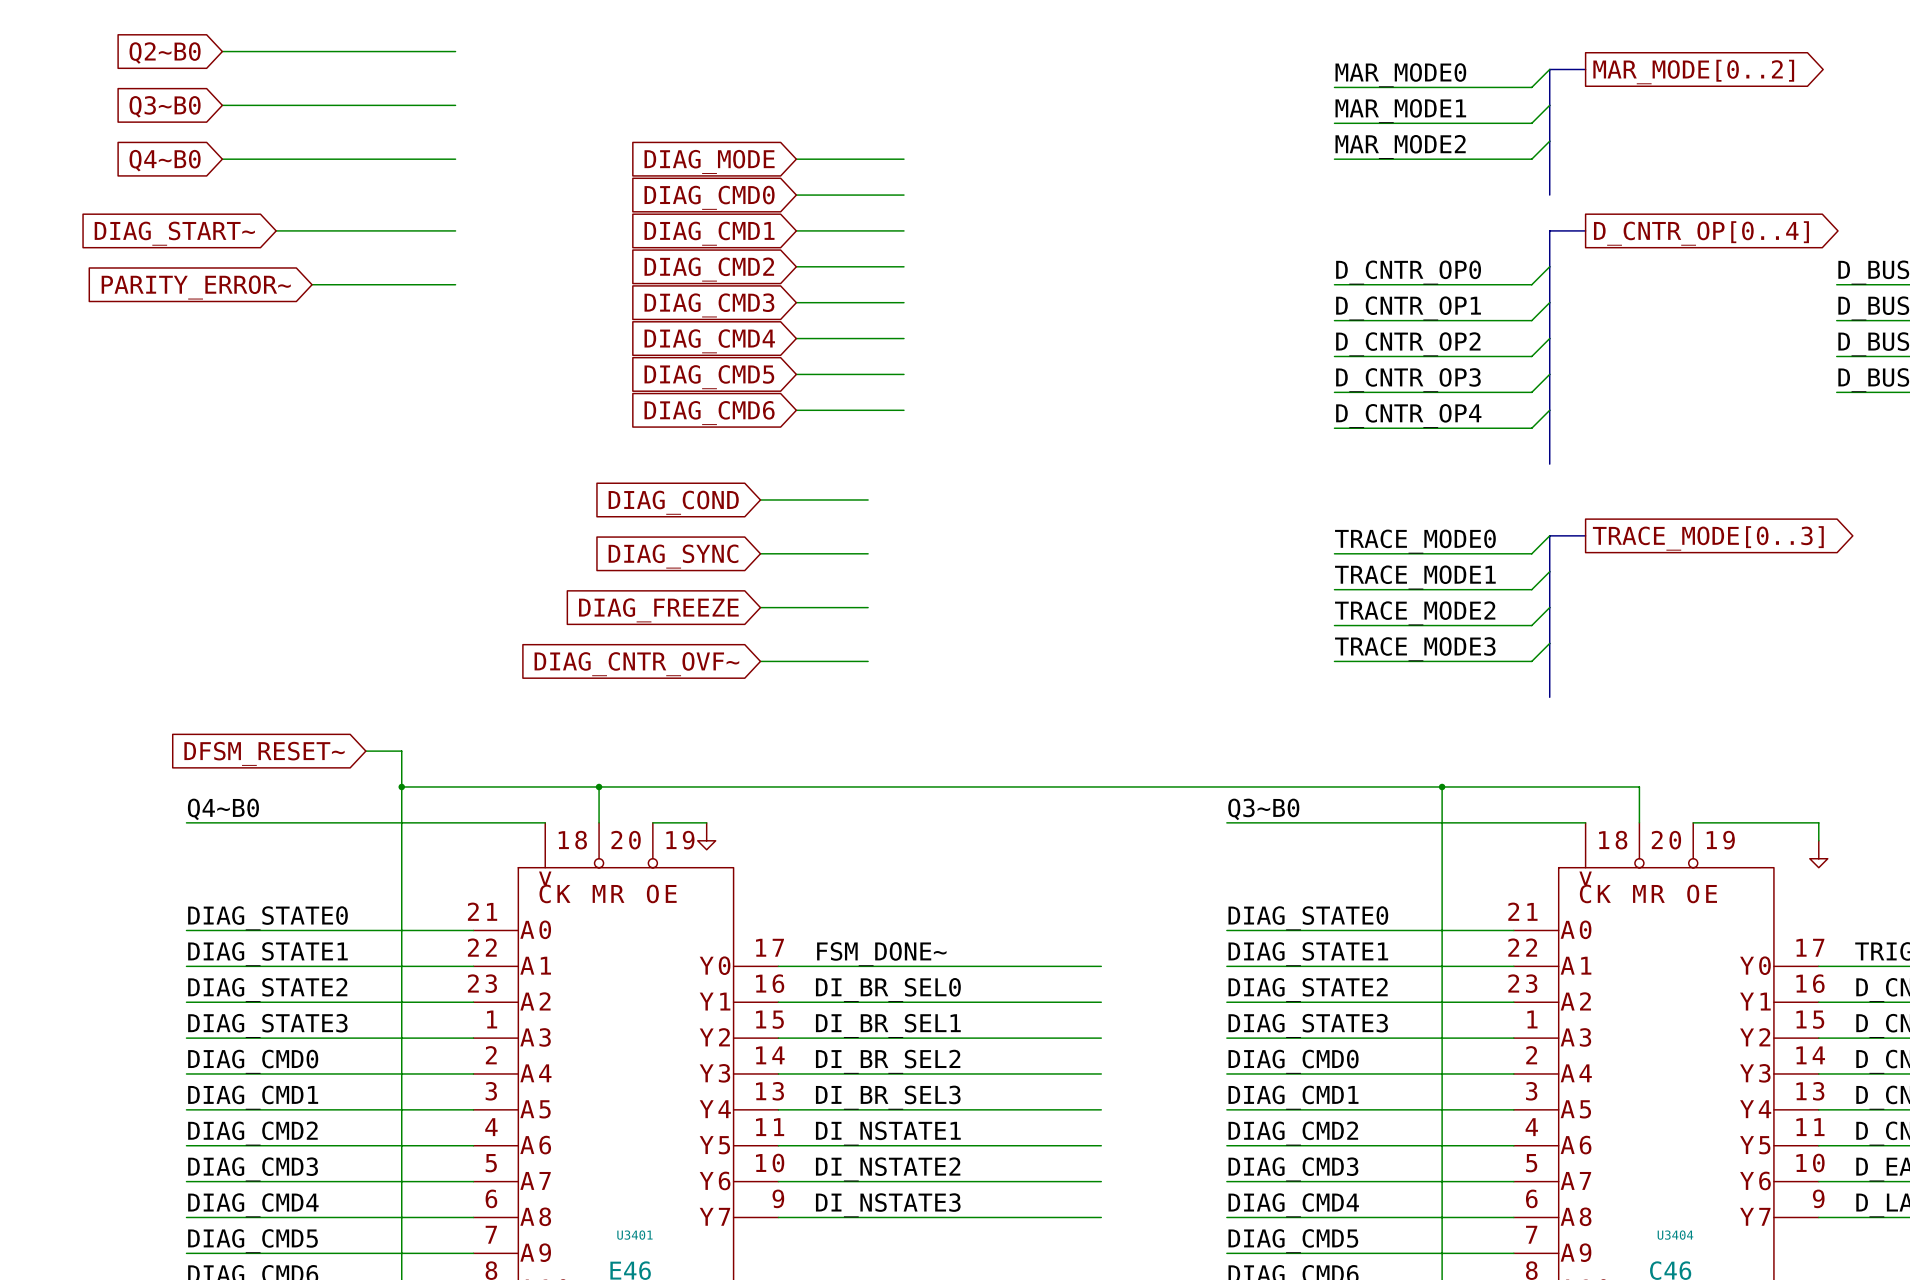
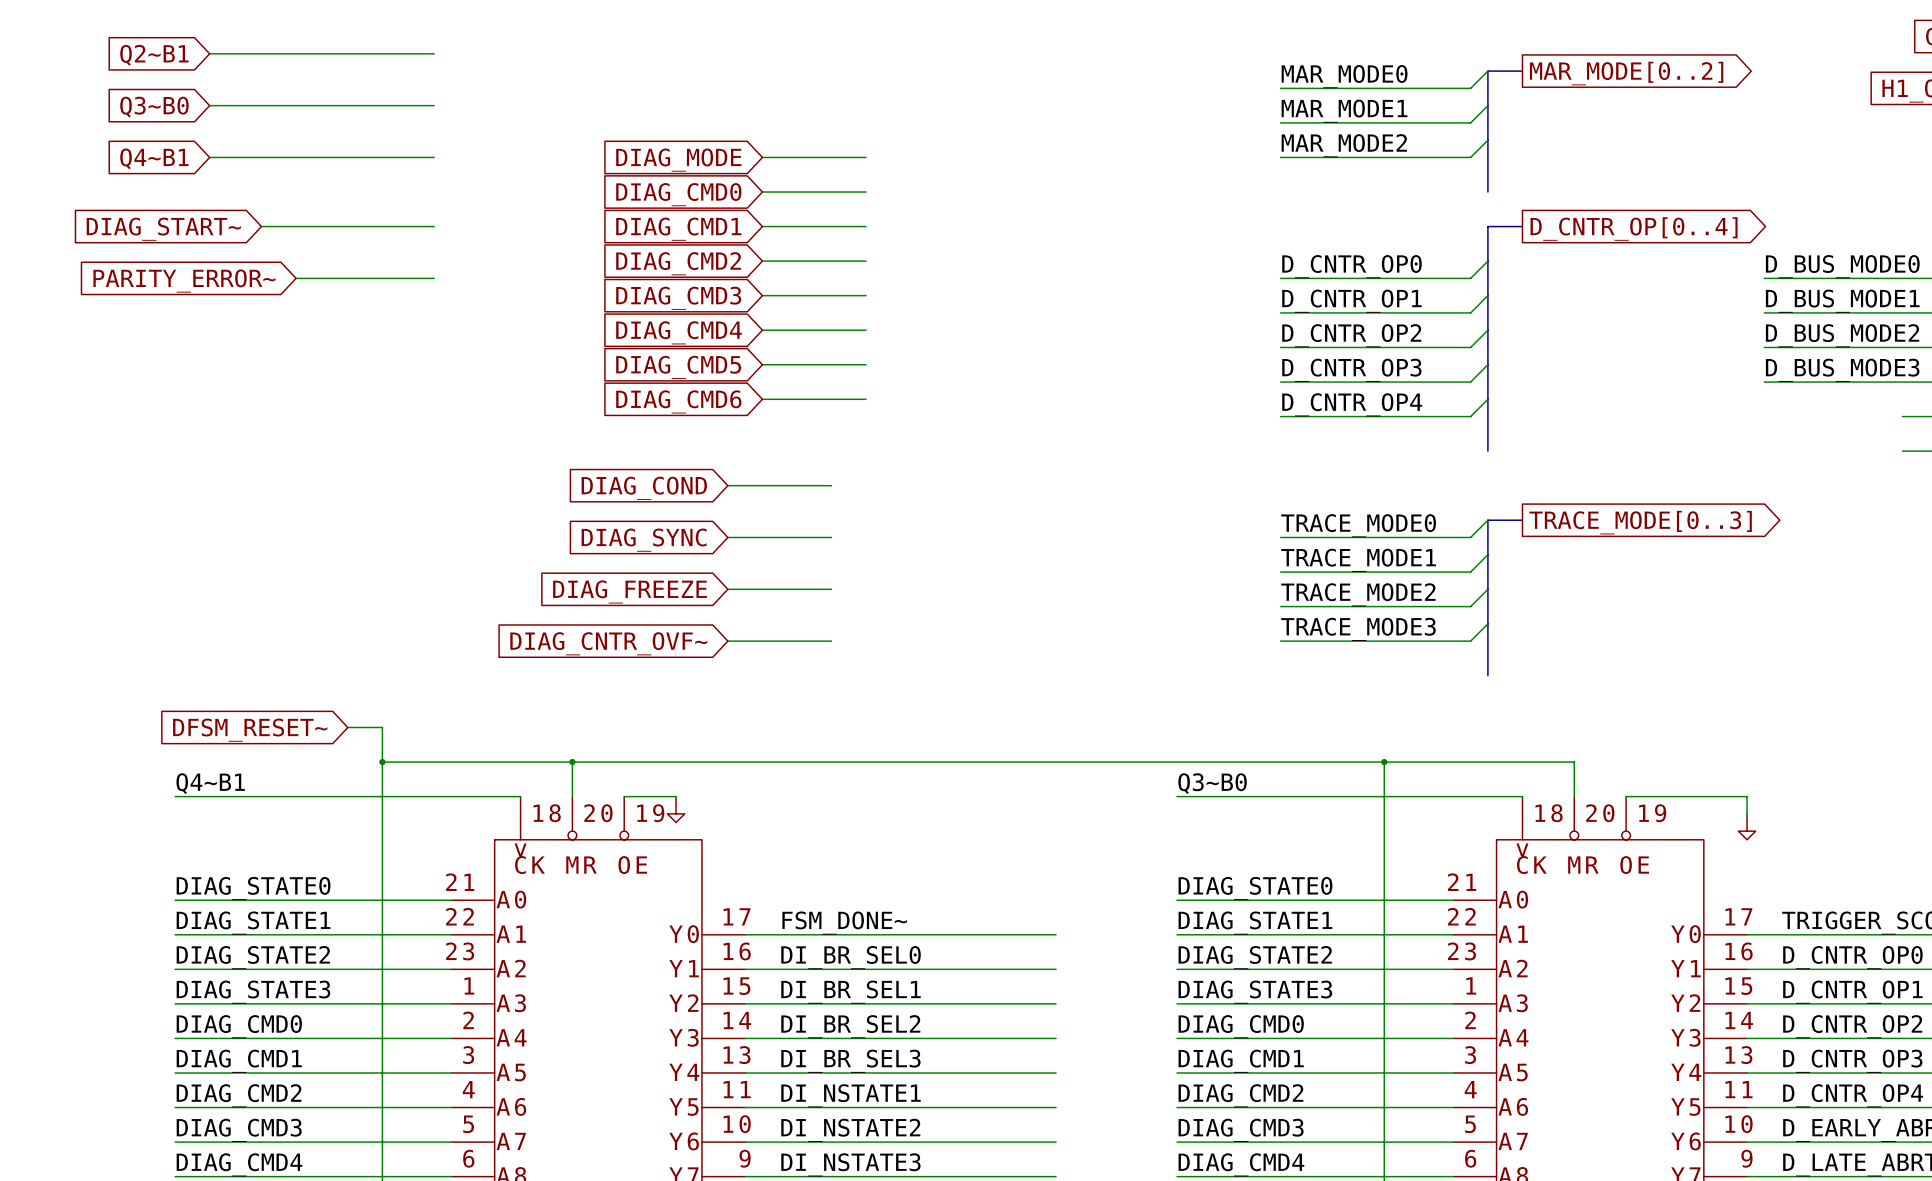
global label: Q2~B0 (165, 53) -> Q2~B1 (154, 55)
global label: Q4~B0 (165, 160) -> Q4~B1 (154, 158)
label: Q4~B0 (223, 809) -> Q4~B1 (210, 783)

